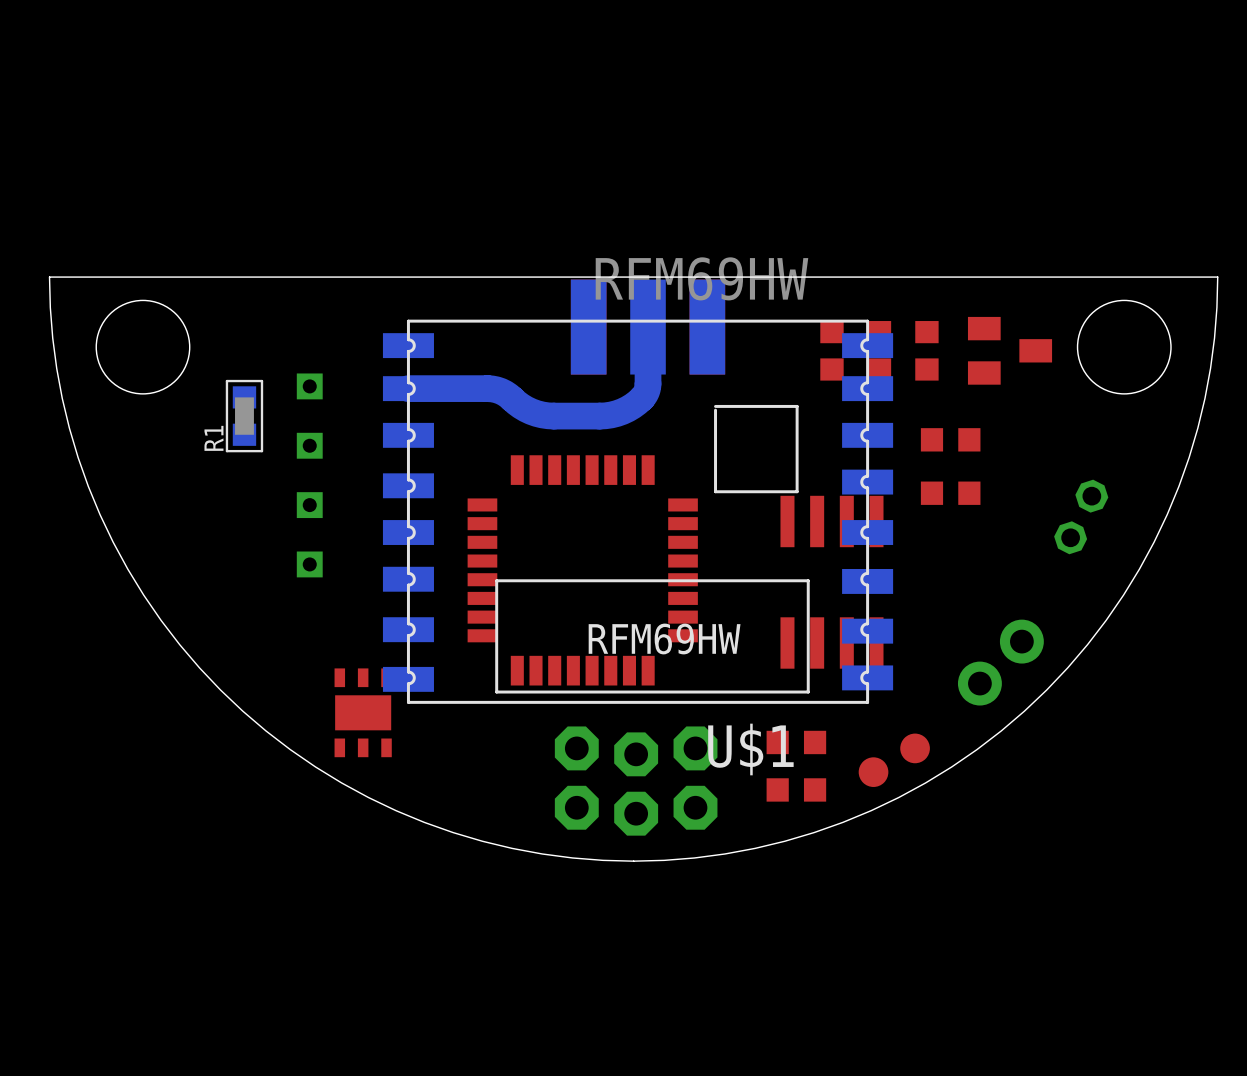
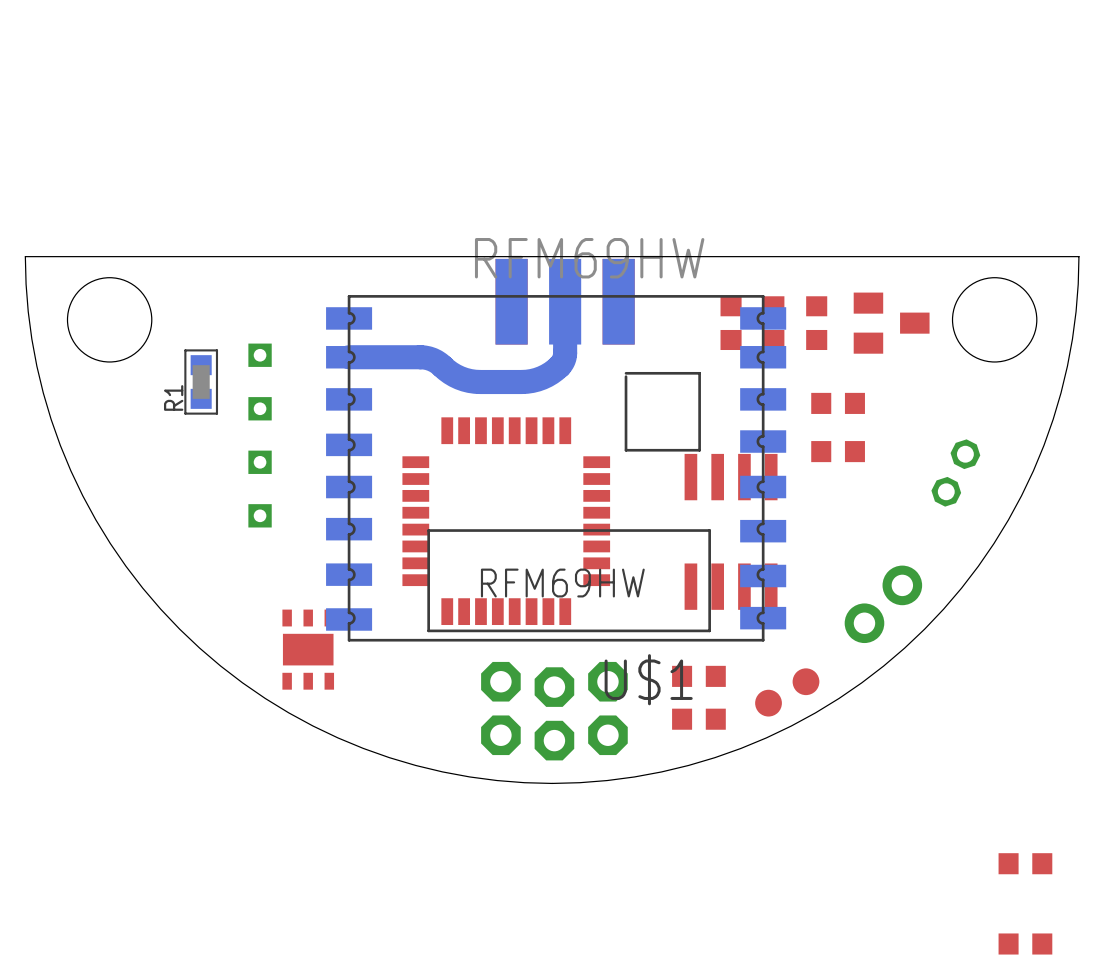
part: none -> (1025, 863)
part: none -> (1025, 944)

